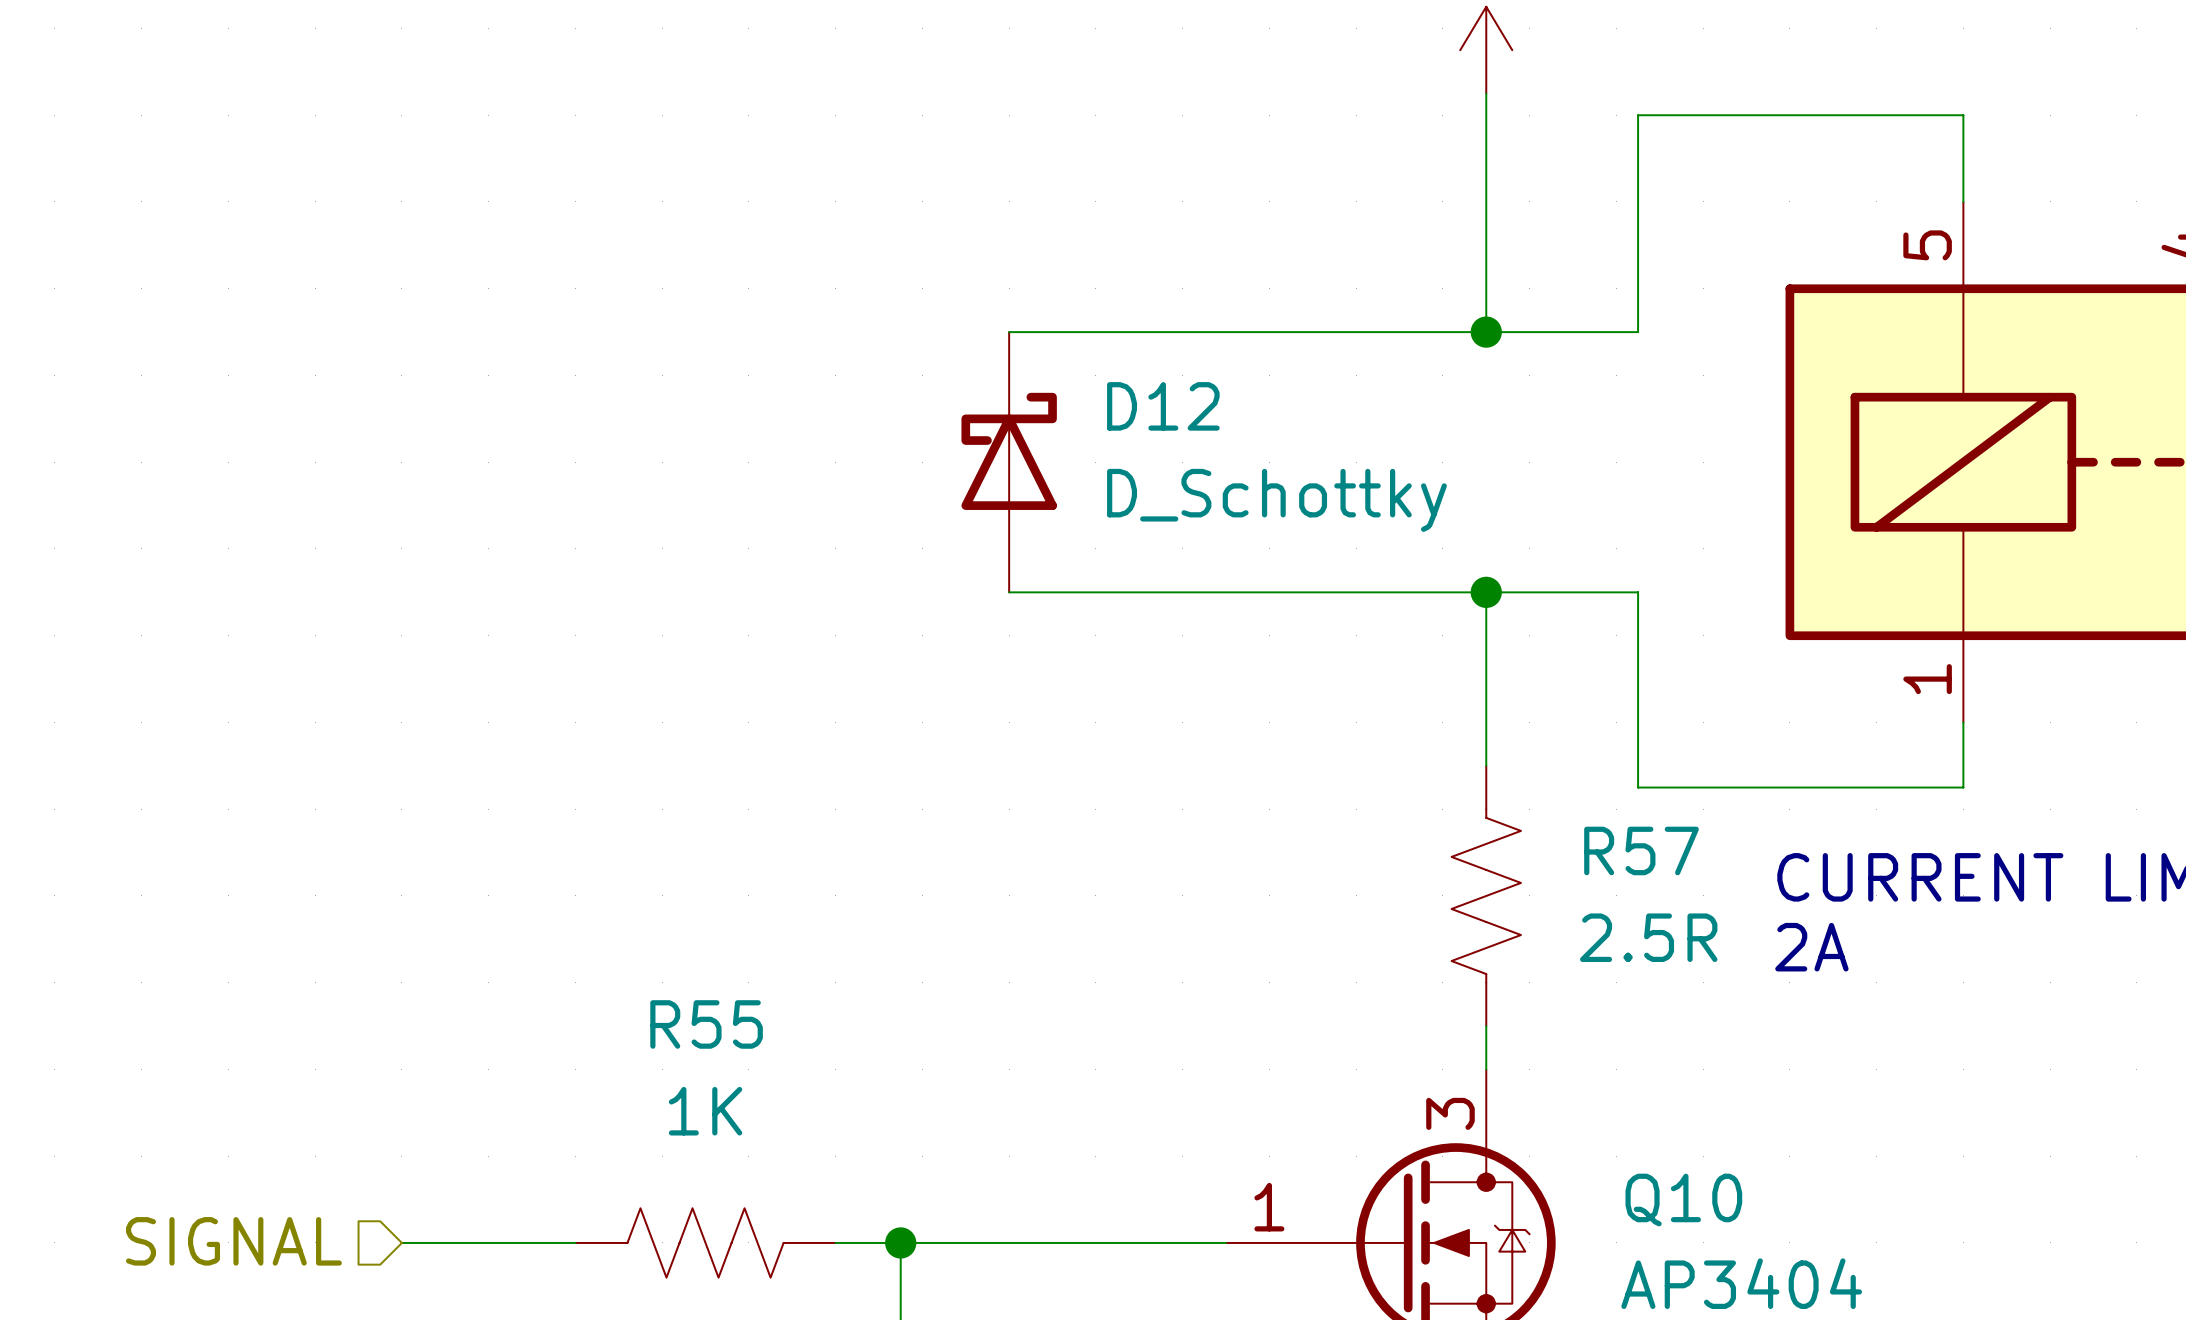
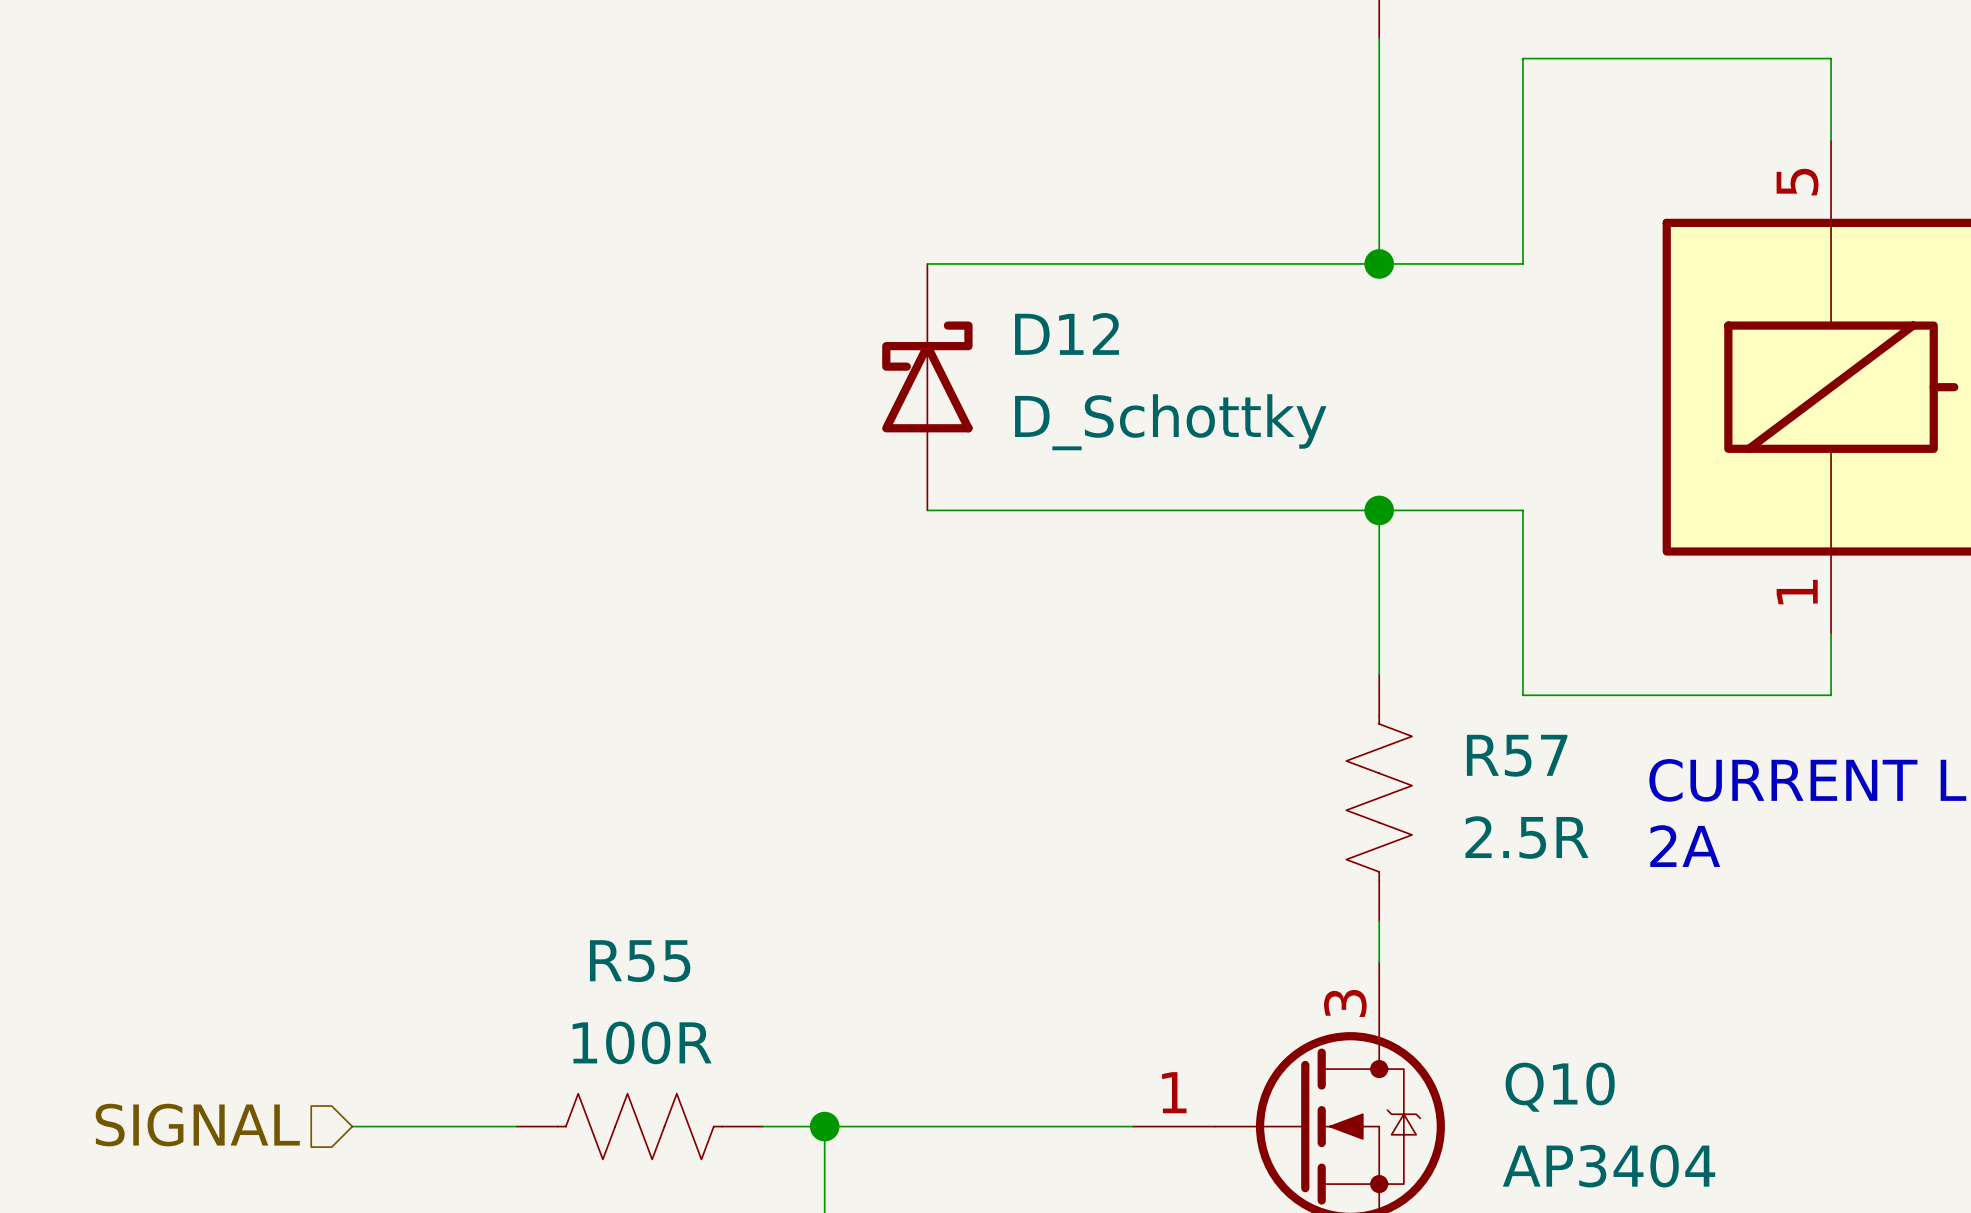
R55 name position: R55 (706, 1024) -> R55 (640, 961)
R55 value: 1K (705, 1111) -> 100R (642, 1042)

